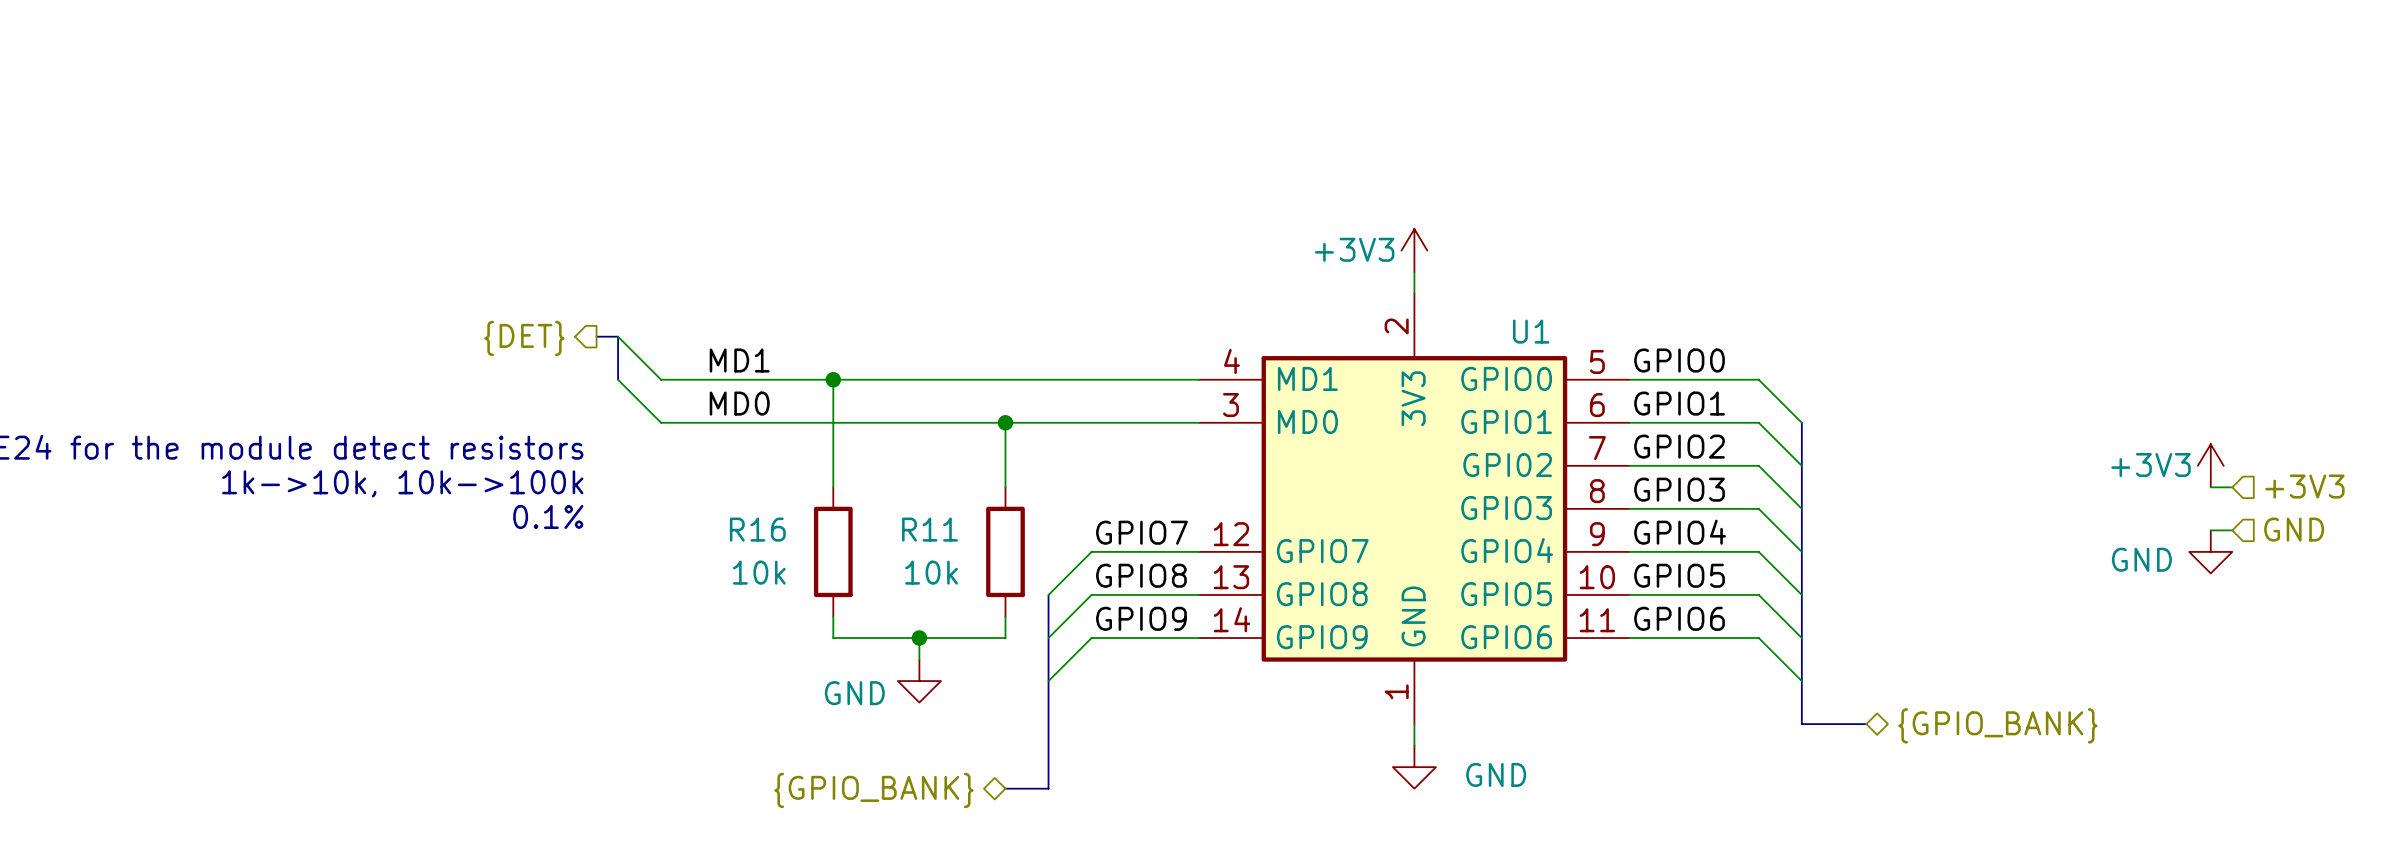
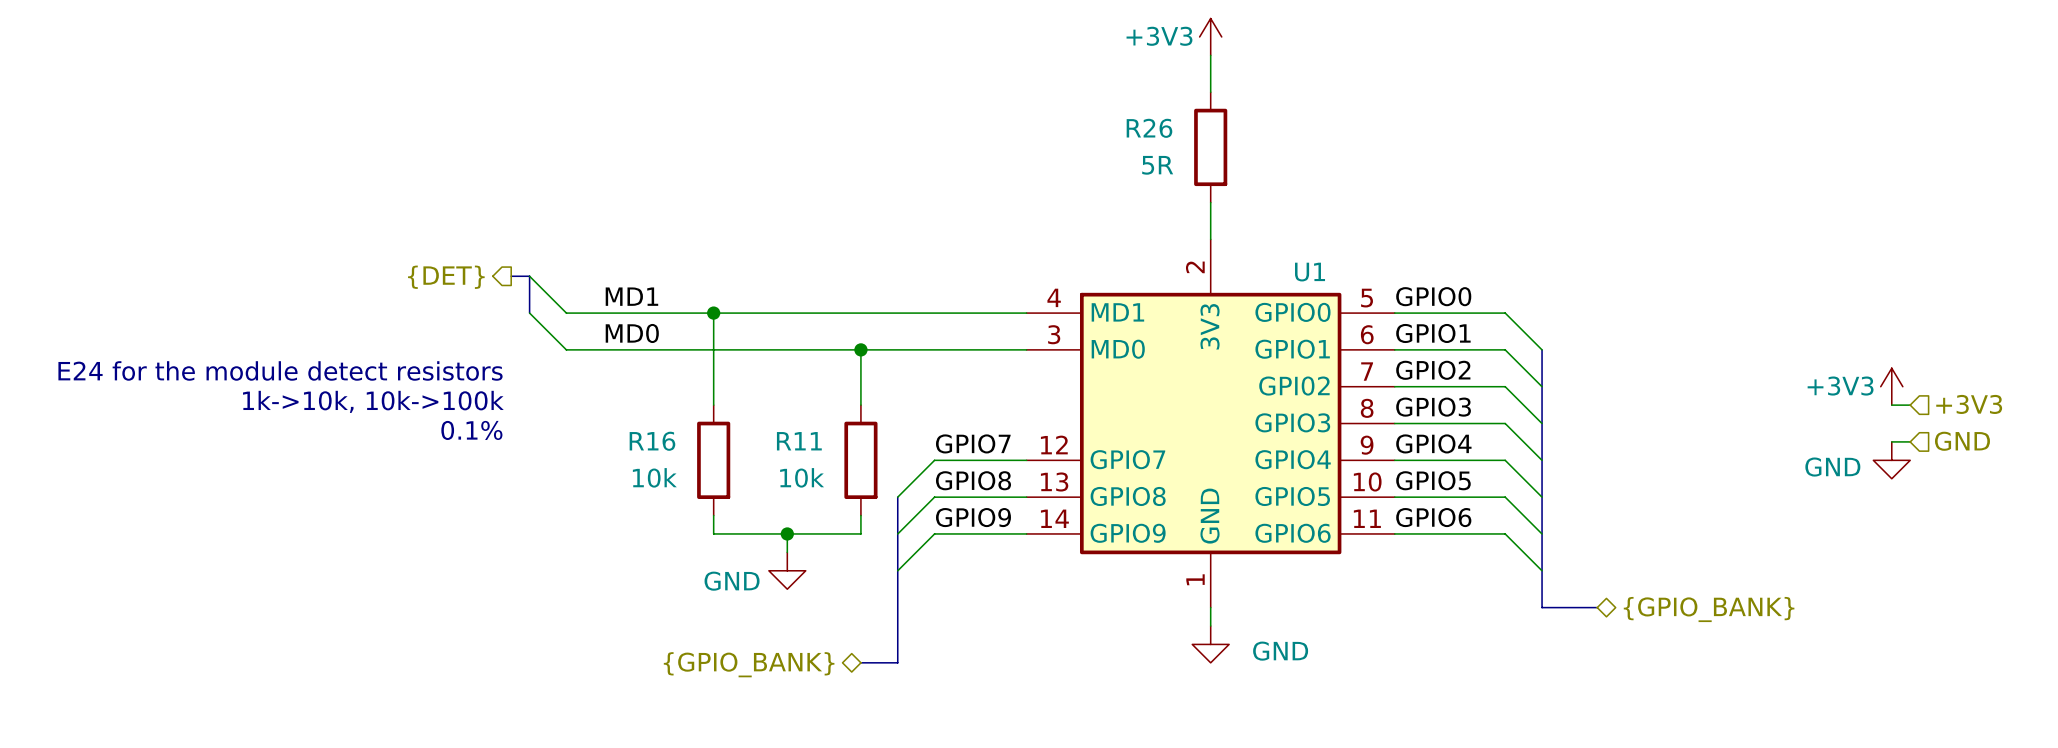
wire: none -> (1210, 55) (1210, 92)
R26: none -> 5R (1210, 147)
power symbol position: +3V3 (1414, 250) -> +3V3 (1210, 36)

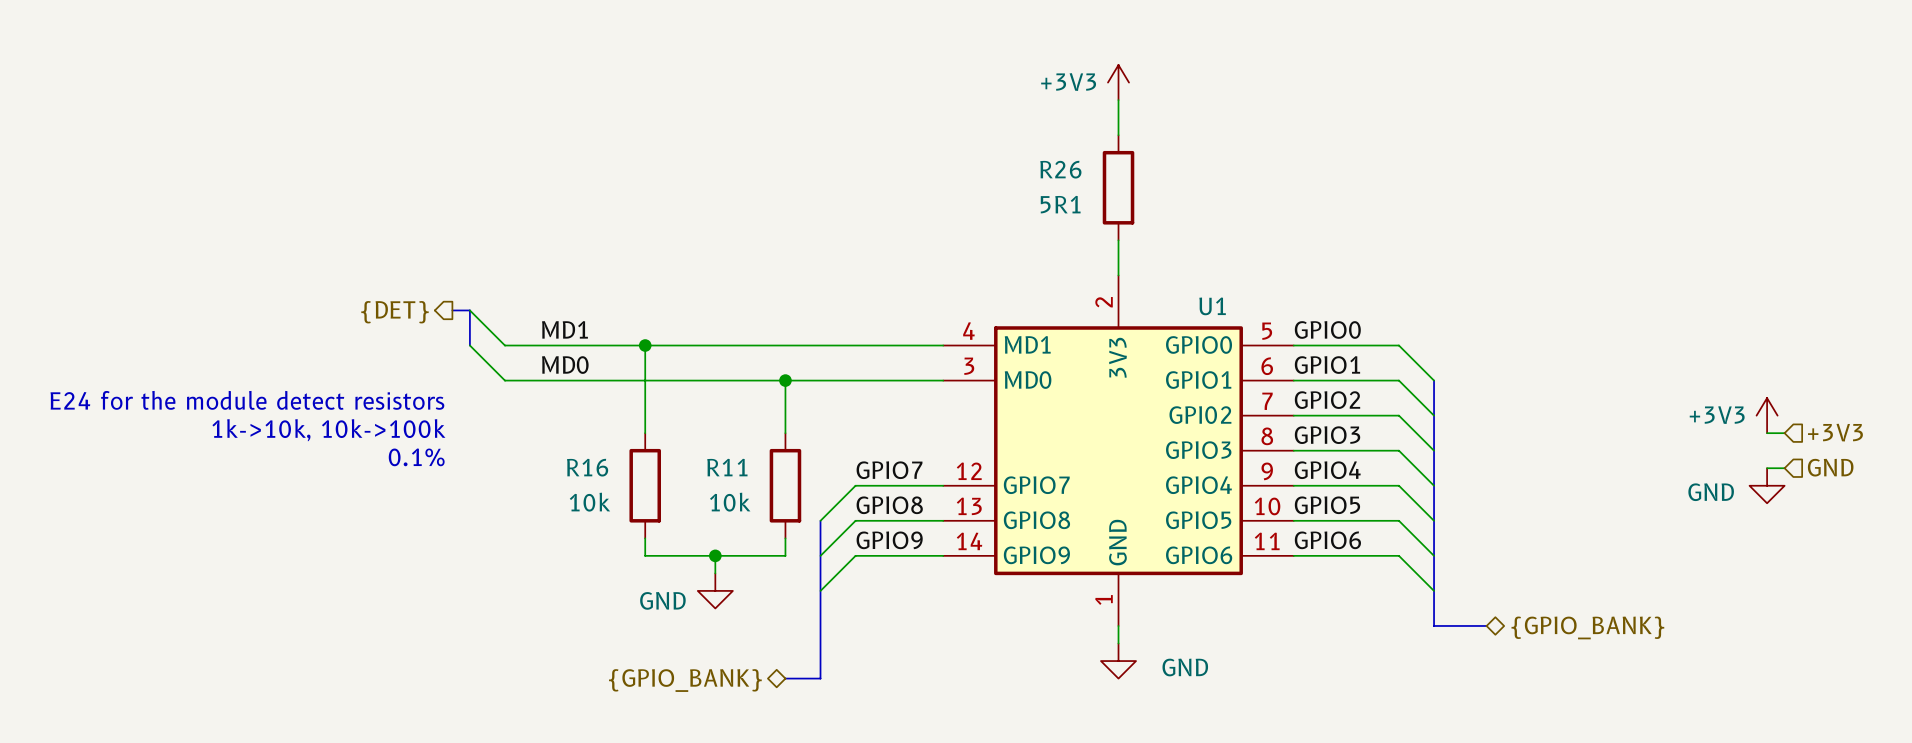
R26 value: 5R (1157, 165) -> 5R1 (1060, 204)

